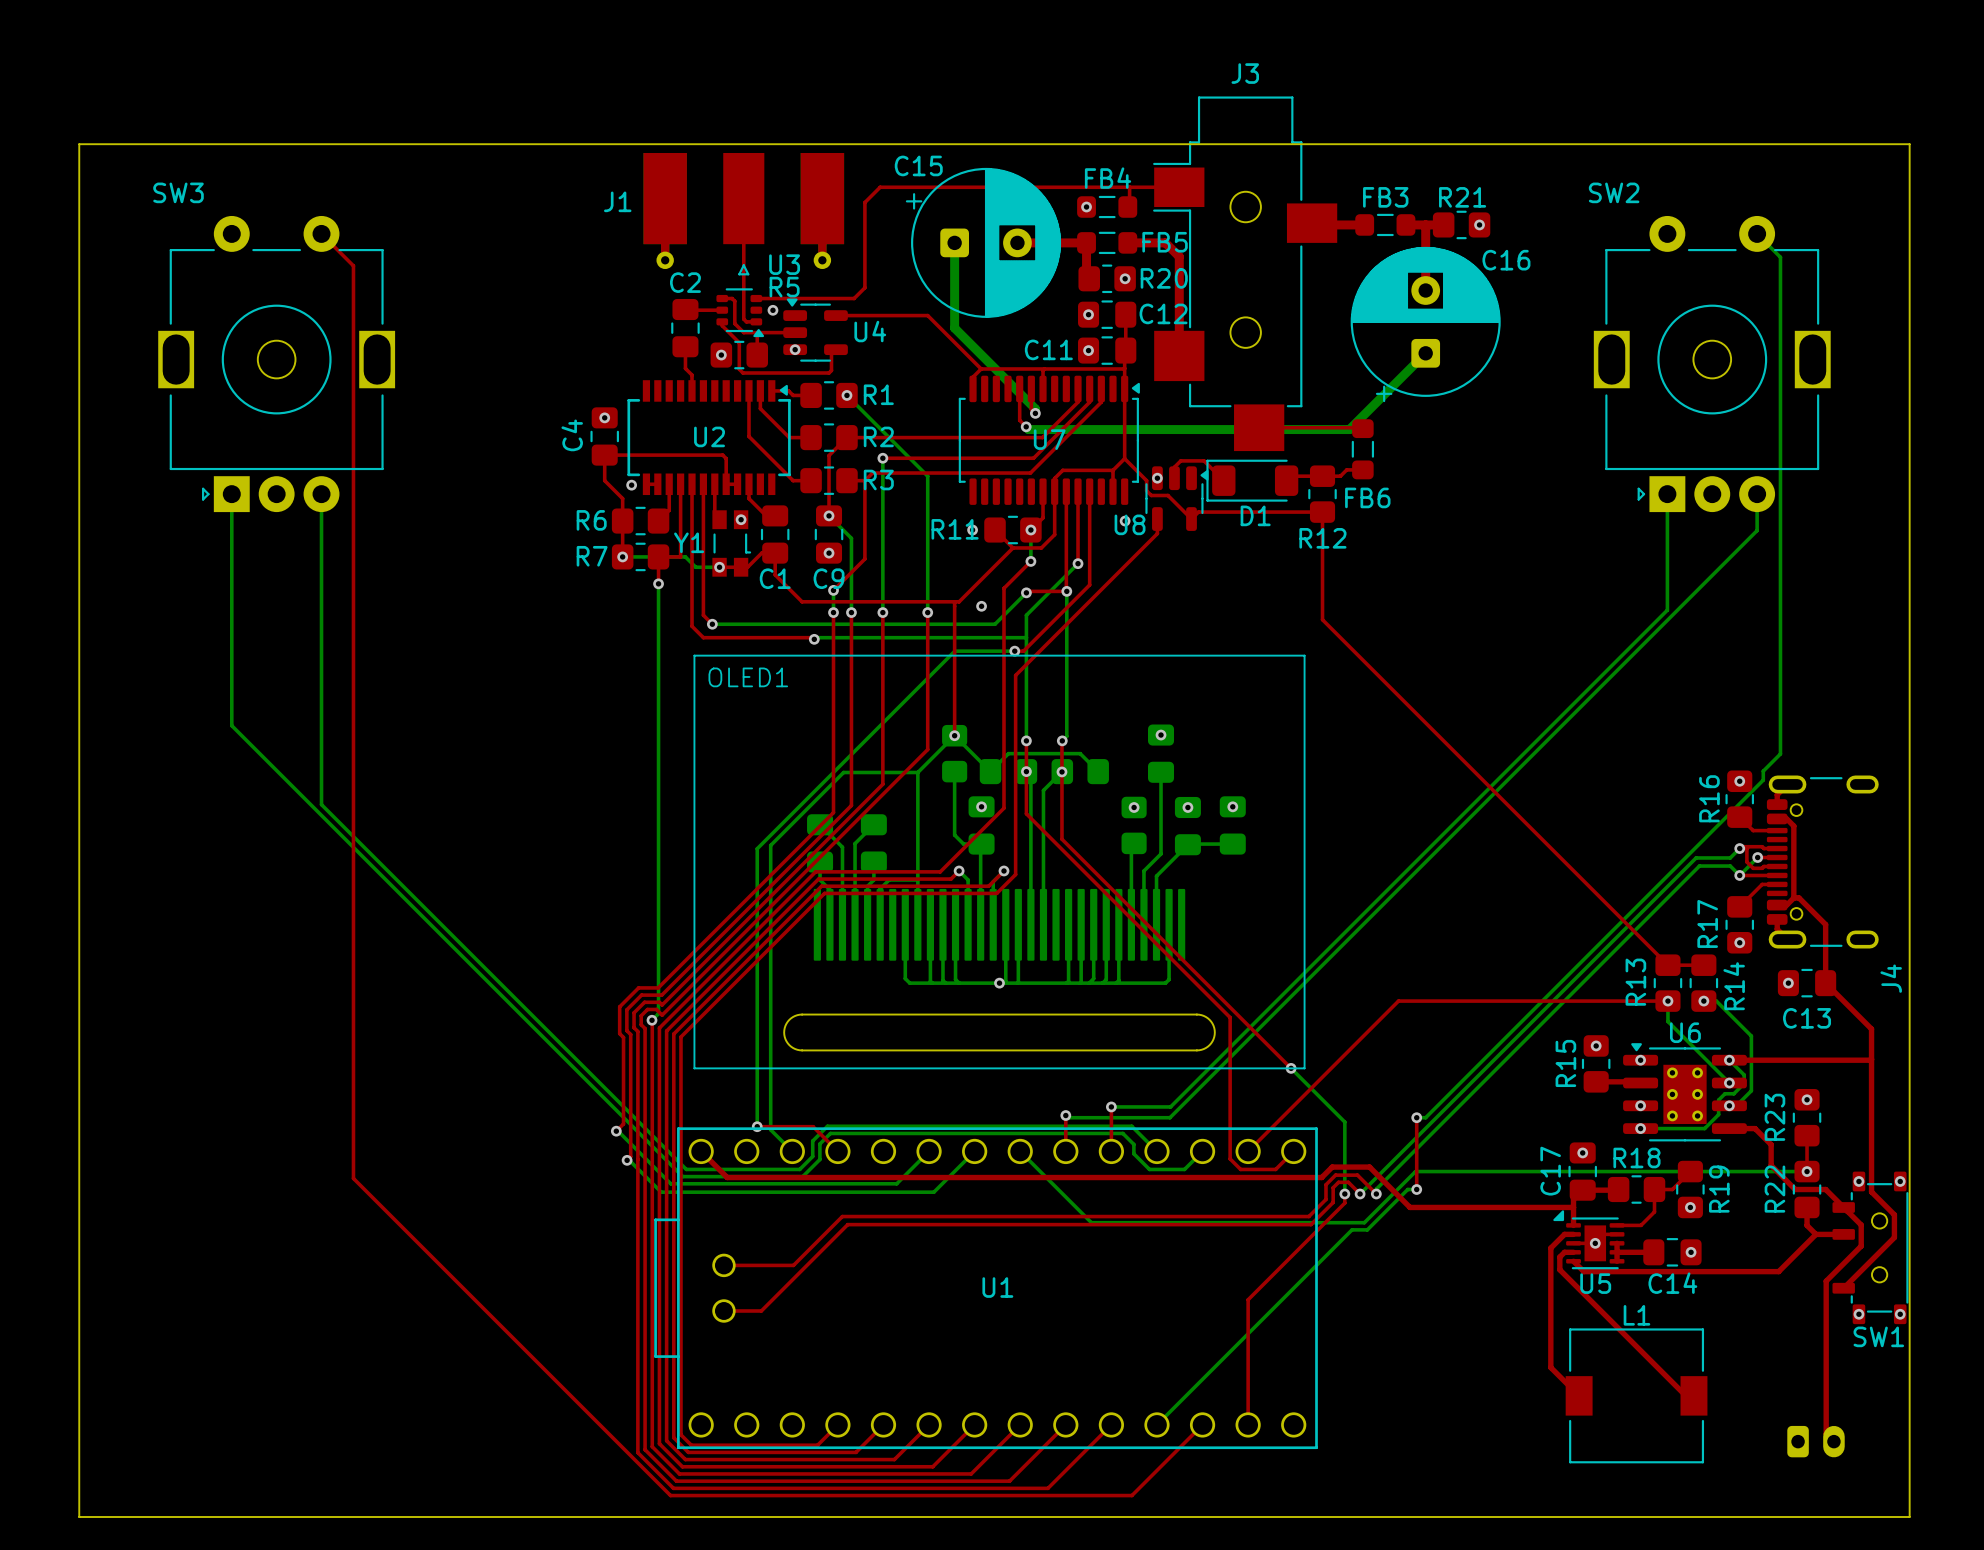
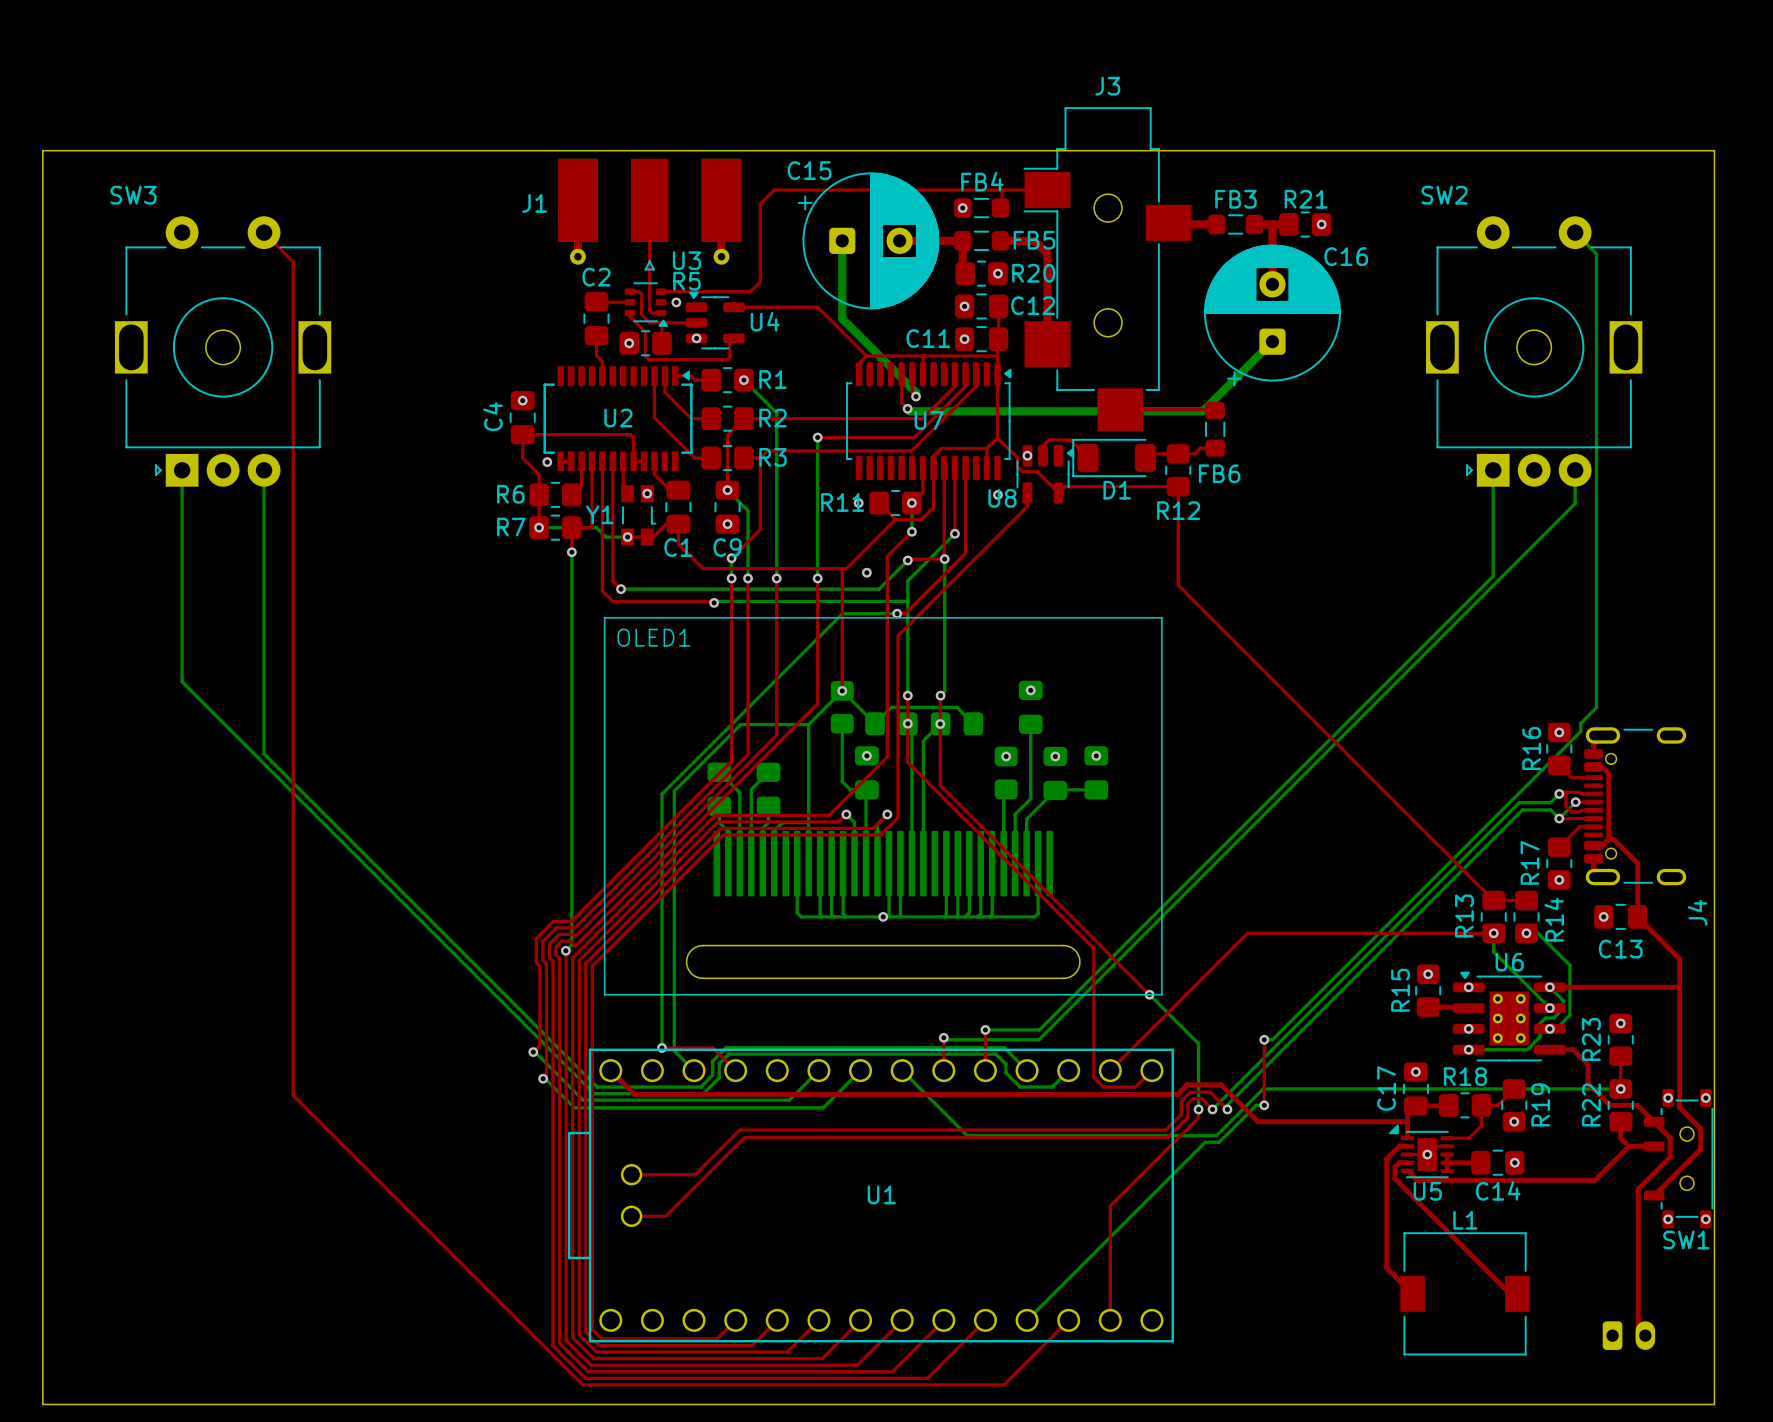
bottom track: (882, 431) (927, 476) -> (776, 412) (776, 437)
top track: (882, 458) (927, 458) -> none
via position: (882, 458) -> (817, 437)
bottom track: none -> (817, 437) (817, 453)

